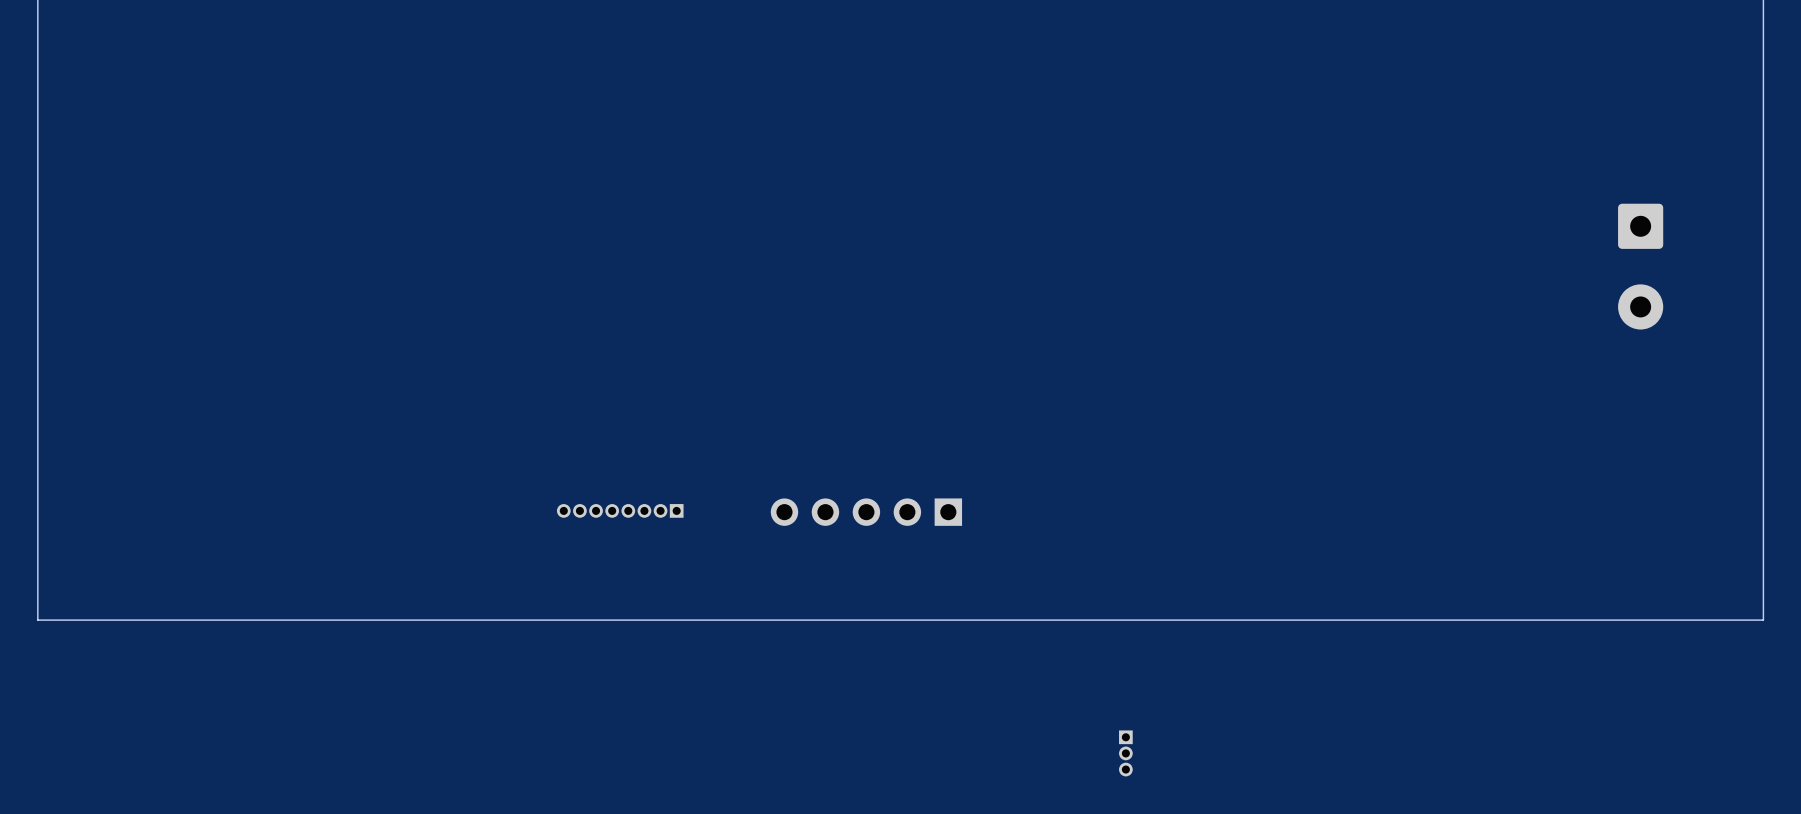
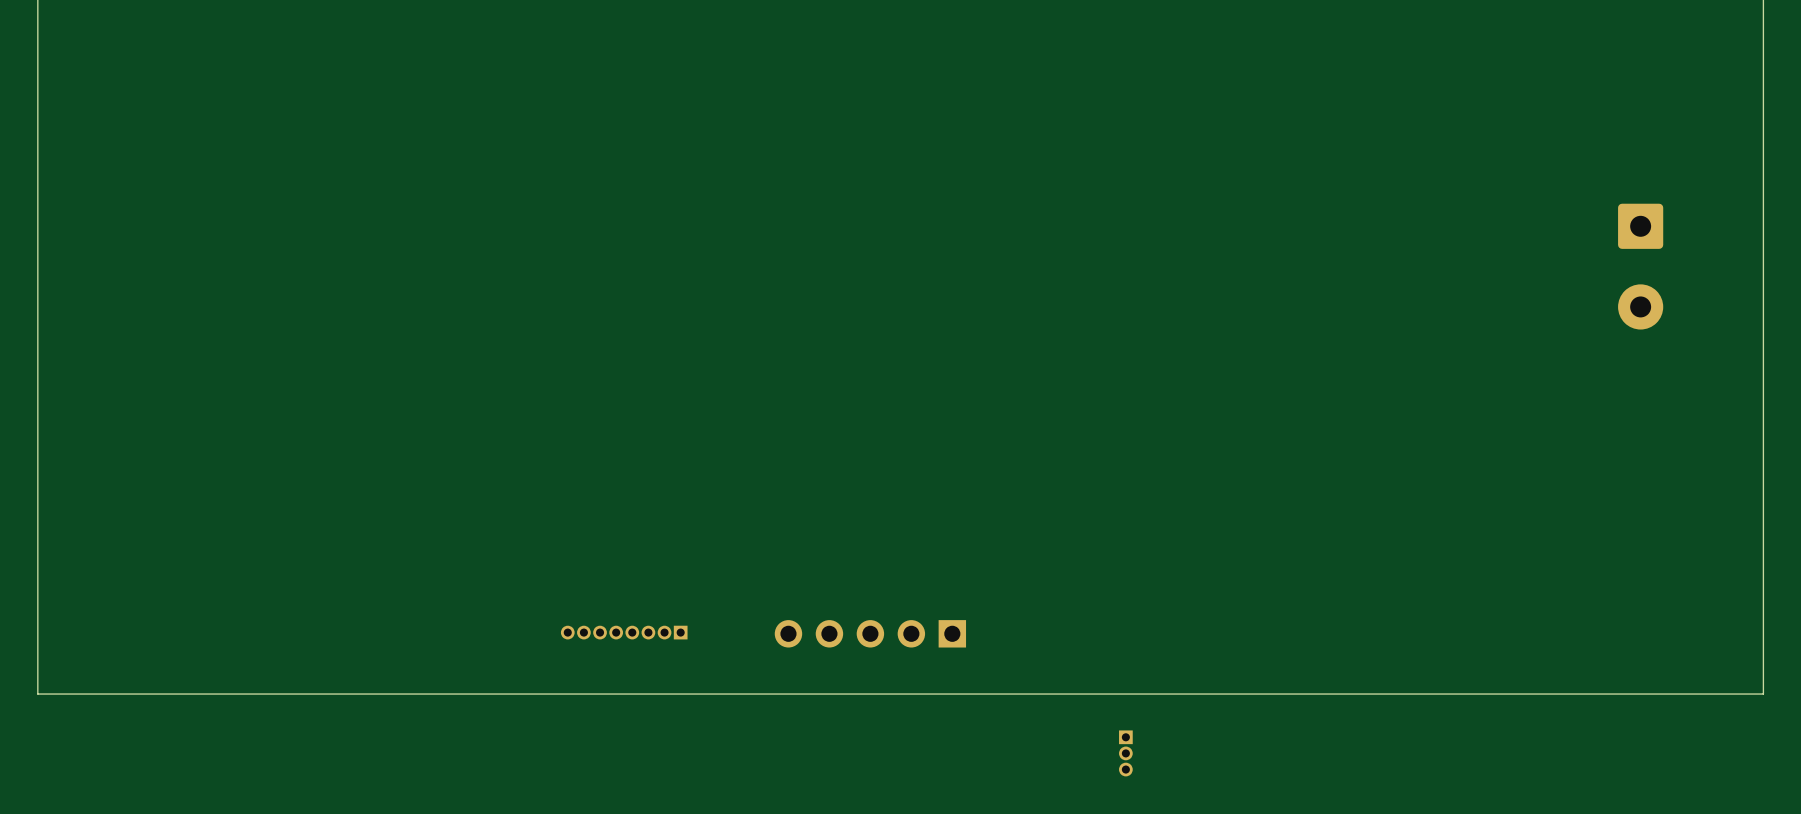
part position: (620, 510) -> (624, 632)
part position: (866, 512) -> (870, 633)
board edge: (1763, 620) (37, 620) -> (1763, 620) (1763, 694) (37, 694) (37, 620)

